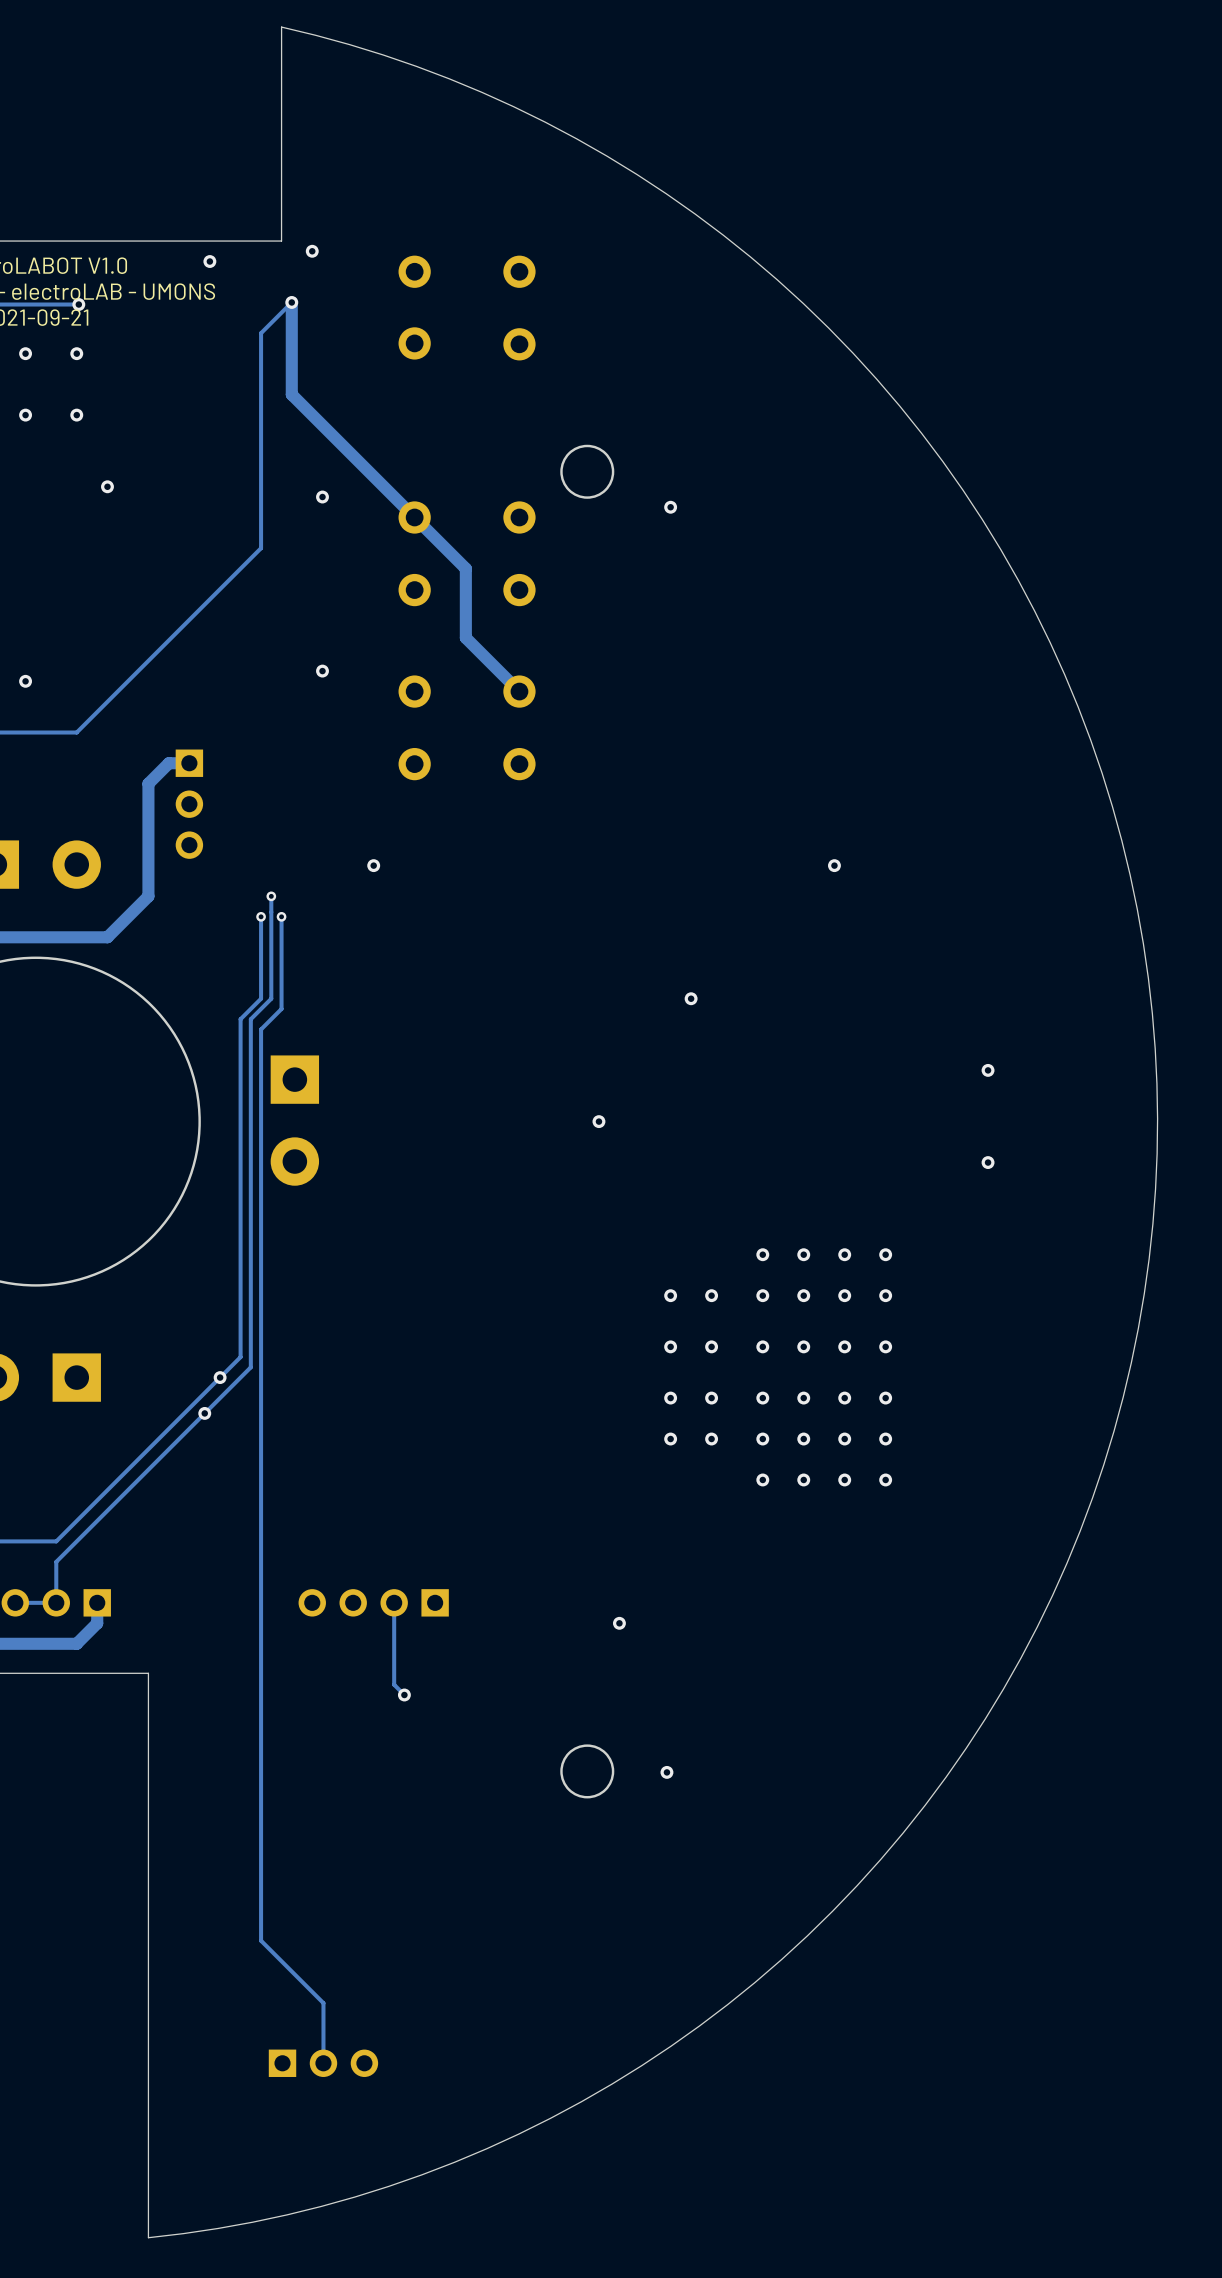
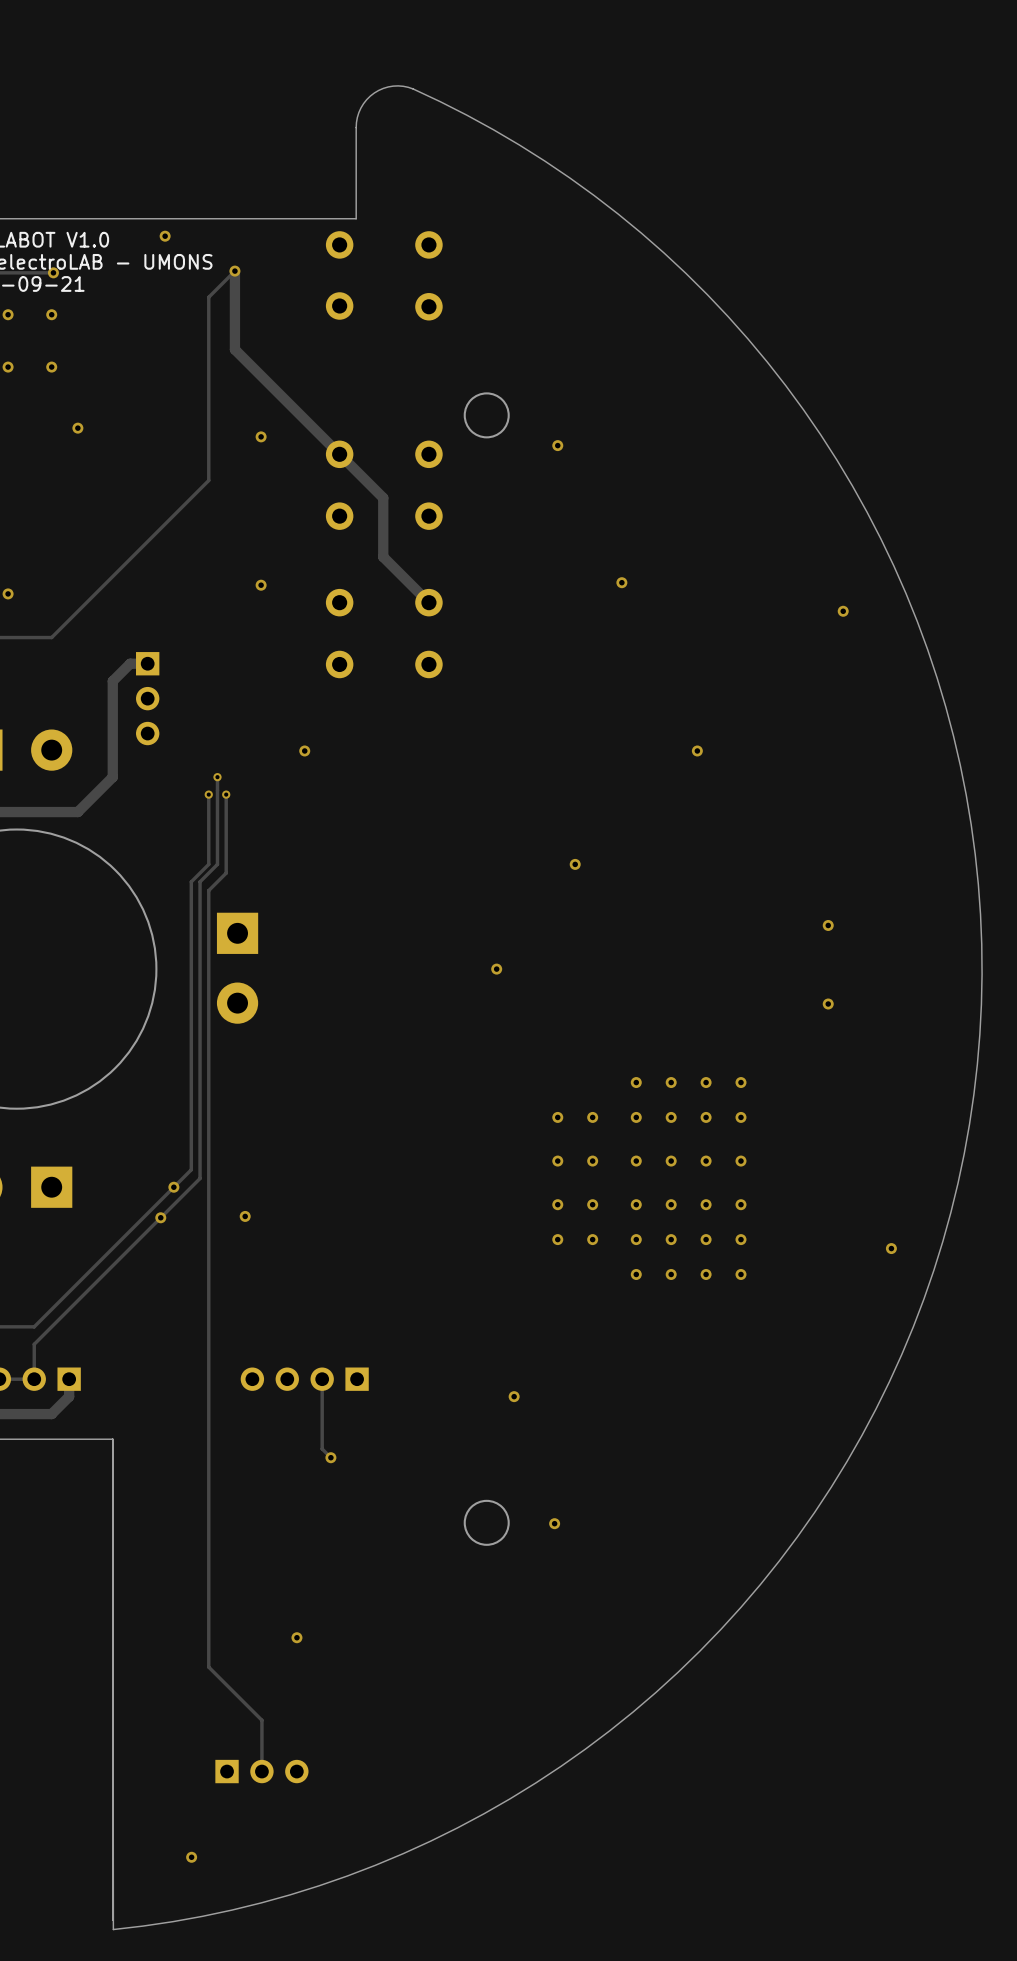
board edge: (281, 241) (281, 27) (349, 44) (416, 66) (513, 106) (576, 138) (636, 174) (723, 235) (777, 279) (853, 353) (921, 433) (963, 490) (1000, 549) (1050, 642) (1090, 739) (1121, 840) (1143, 943) (1155, 1048) (1157, 1118) (1155, 1189) (1144, 1293) (1123, 1397) (1103, 1464) (1066, 1563) (1020, 1658) (966, 1748) (903, 1832) (832, 1911) (754, 1982) (670, 2046) (611, 2084) (518, 2134) (421, 2174) (355, 2196) (252, 2222) (148, 2237) -> (226, 218) (356, 218) (356, 127) (358, 112) (366, 99) (378, 90) (393, 86) (408, 87) (493, 129) (544, 161) (594, 195) (663, 252) (707, 294) (747, 338) (803, 409) (836, 460) (867, 512) (906, 593) (937, 678) (960, 765) (975, 854) (981, 944) (981, 1004) (977, 1064) (969, 1124) (958, 1183) (933, 1270) (913, 1326) (889, 1381) (861, 1435) (831, 1487) (797, 1536) (760, 1584) (720, 1629) (655, 1692) (609, 1730) (560, 1766) (510, 1798) (457, 1827) (403, 1853) (318, 1885) (261, 1902) (173, 1921) (113, 1929) (112, 1439)
via: (312, 251) -> none
via: none -> (621, 582)
via: none -> (843, 611)
via: none -> (245, 1216)
via: none -> (891, 1248)
via: none -> (296, 1637)
via: none -> (191, 1857)

